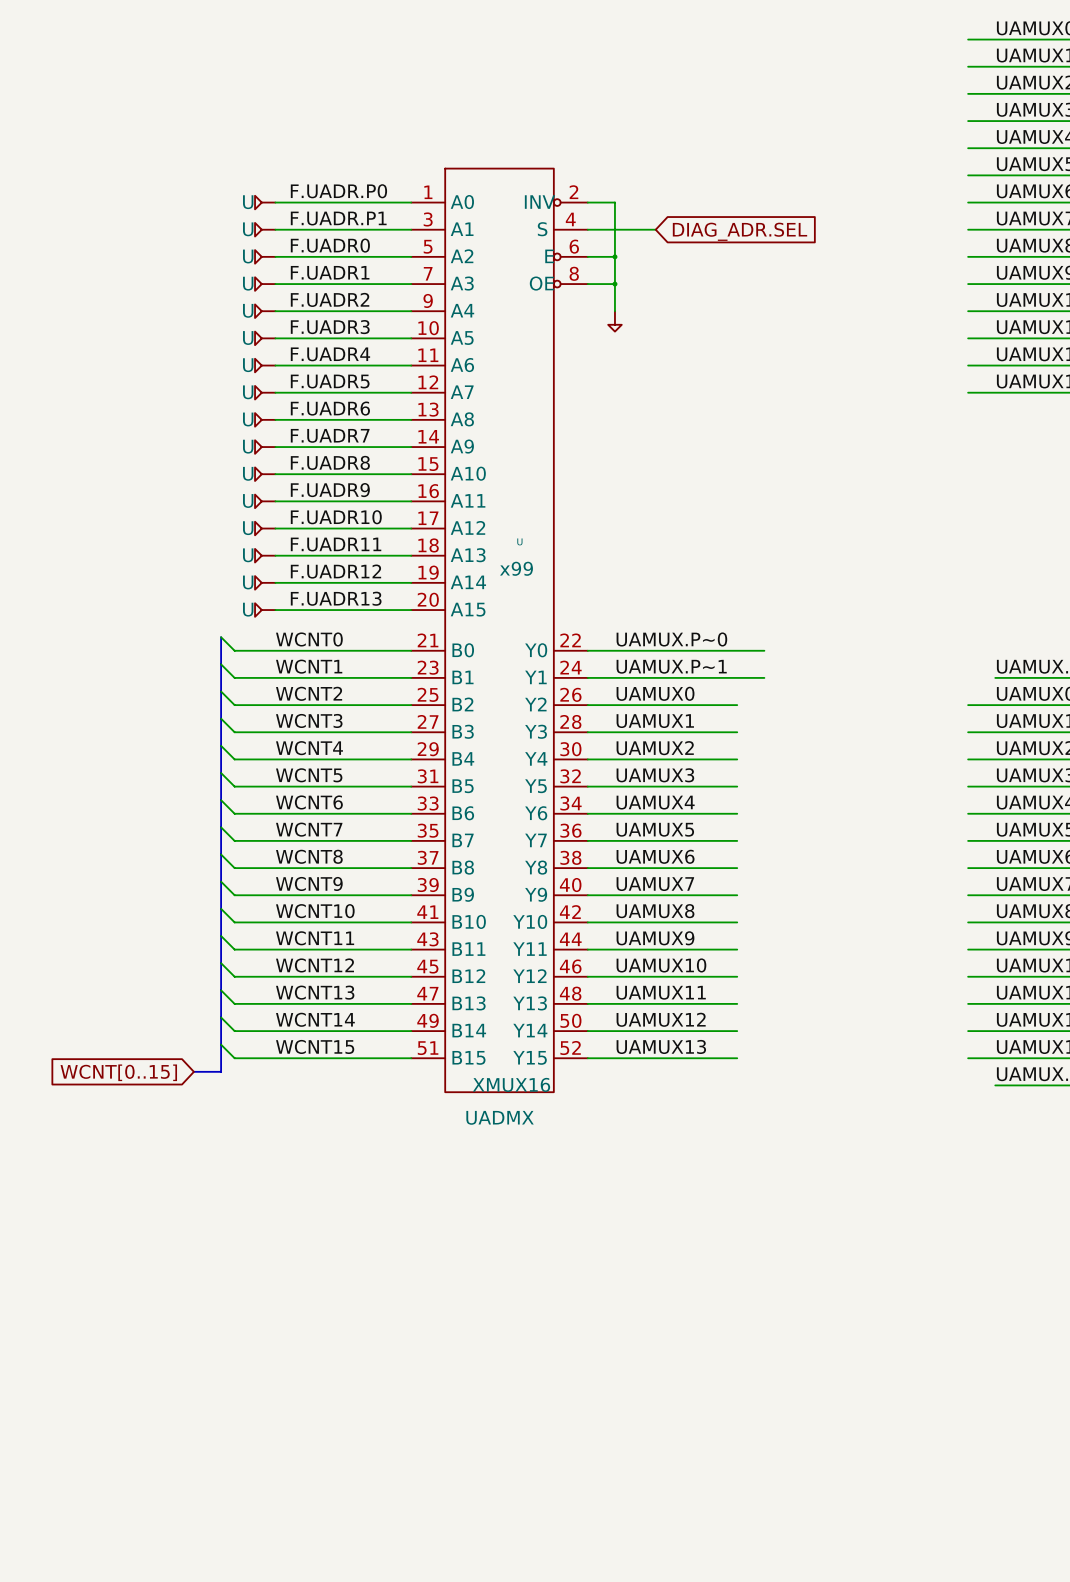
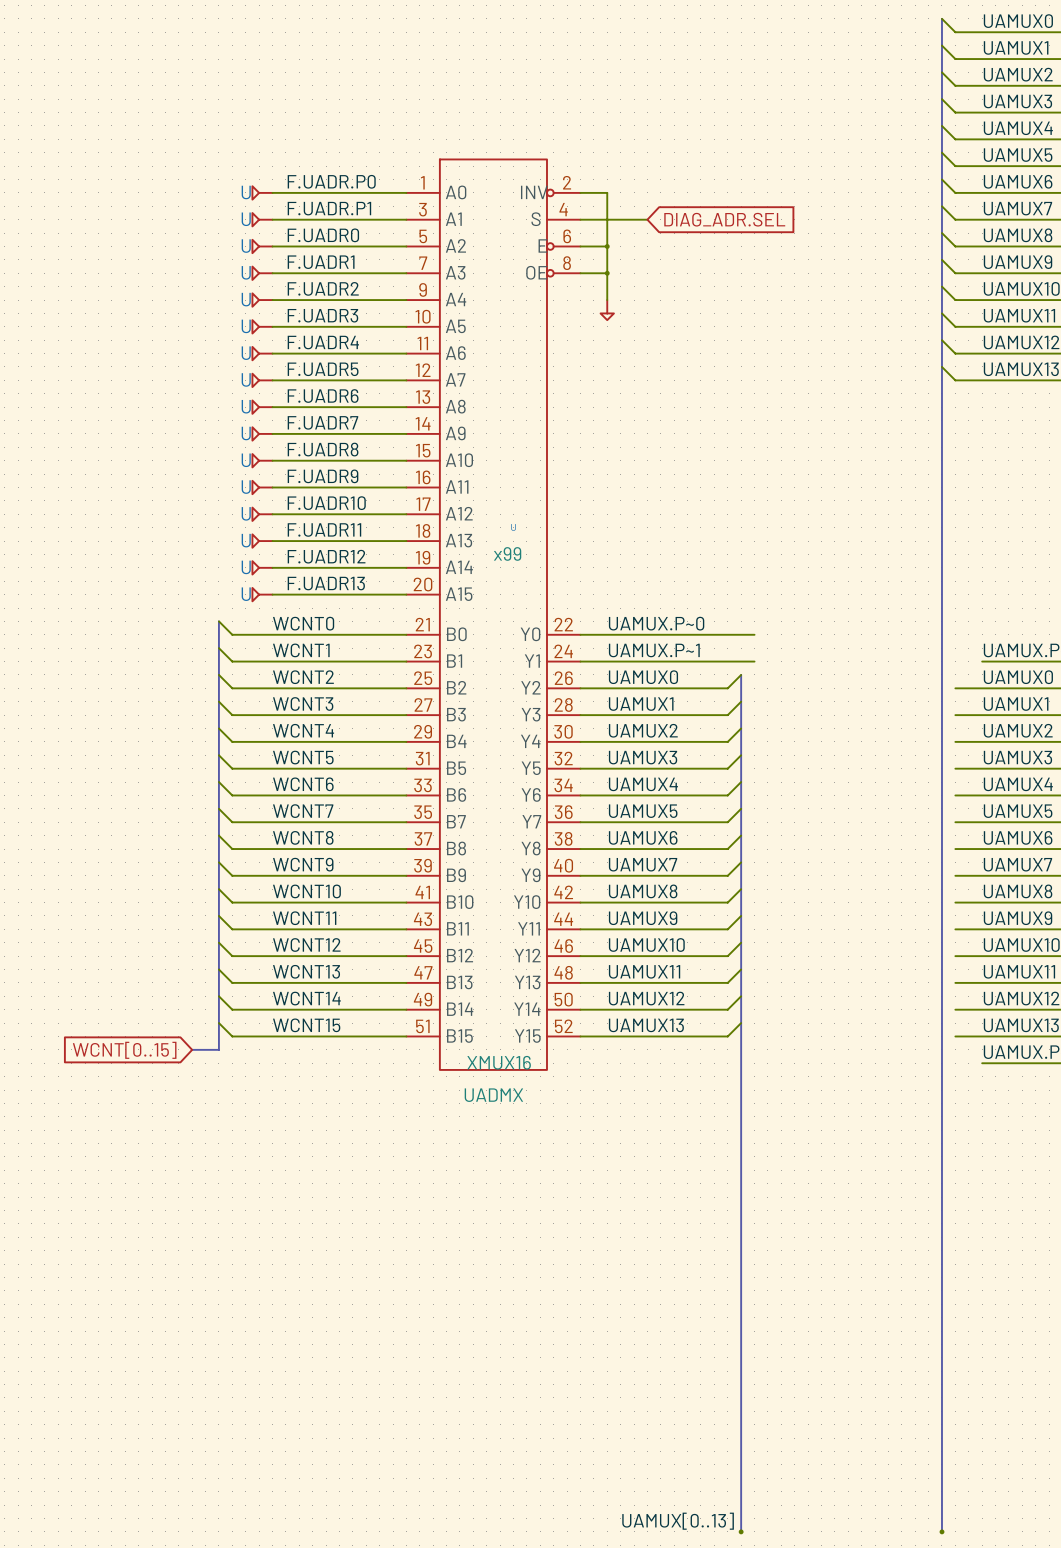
wire: none -> (941, 18) (955, 32)
bus: none -> (941, 18) (941, 1531)
wire: none -> (941, 45) (955, 59)
wire: none -> (941, 72) (955, 85)
wire: none -> (941, 99) (955, 112)
wire: none -> (941, 125) (955, 139)
wire: none -> (941, 152) (955, 166)
wire: none -> (941, 179) (955, 192)
wire: none -> (941, 206) (955, 219)
wire: none -> (941, 233) (955, 246)
wire: none -> (941, 259) (955, 273)
wire: none -> (941, 286) (955, 300)
wire: none -> (941, 313) (955, 326)
wire: none -> (941, 340) (955, 353)
wire: none -> (941, 366) (955, 380)
wire: none -> (741, 674) (727, 688)
bus: none -> (741, 674) (741, 1531)
wire: none -> (741, 701) (727, 715)
wire: none -> (741, 728) (727, 741)
wire: none -> (741, 755) (727, 768)
wire: none -> (741, 782) (727, 795)
wire: none -> (741, 808) (727, 822)
wire: none -> (741, 835) (727, 849)
wire: none -> (741, 862) (727, 875)
wire: none -> (741, 889) (727, 902)
wire: none -> (741, 915) (727, 929)
wire: none -> (741, 942) (727, 956)
wire: none -> (741, 969) (727, 982)
wire: none -> (741, 996) (727, 1009)
wire: none -> (741, 1023) (727, 1036)
label: none -> UAMUX[0..13] (678, 1521)
junction: none -> (741, 1531)
junction: none -> (941, 1531)

